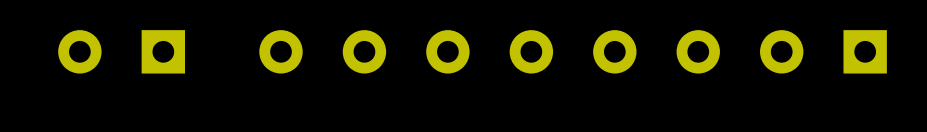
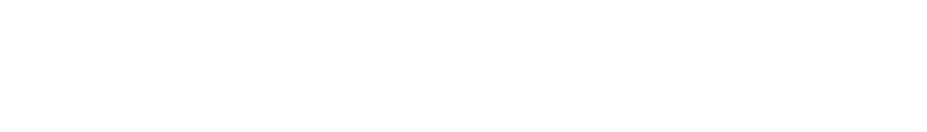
part: (121, 51) -> none
part: (573, 51) -> none

